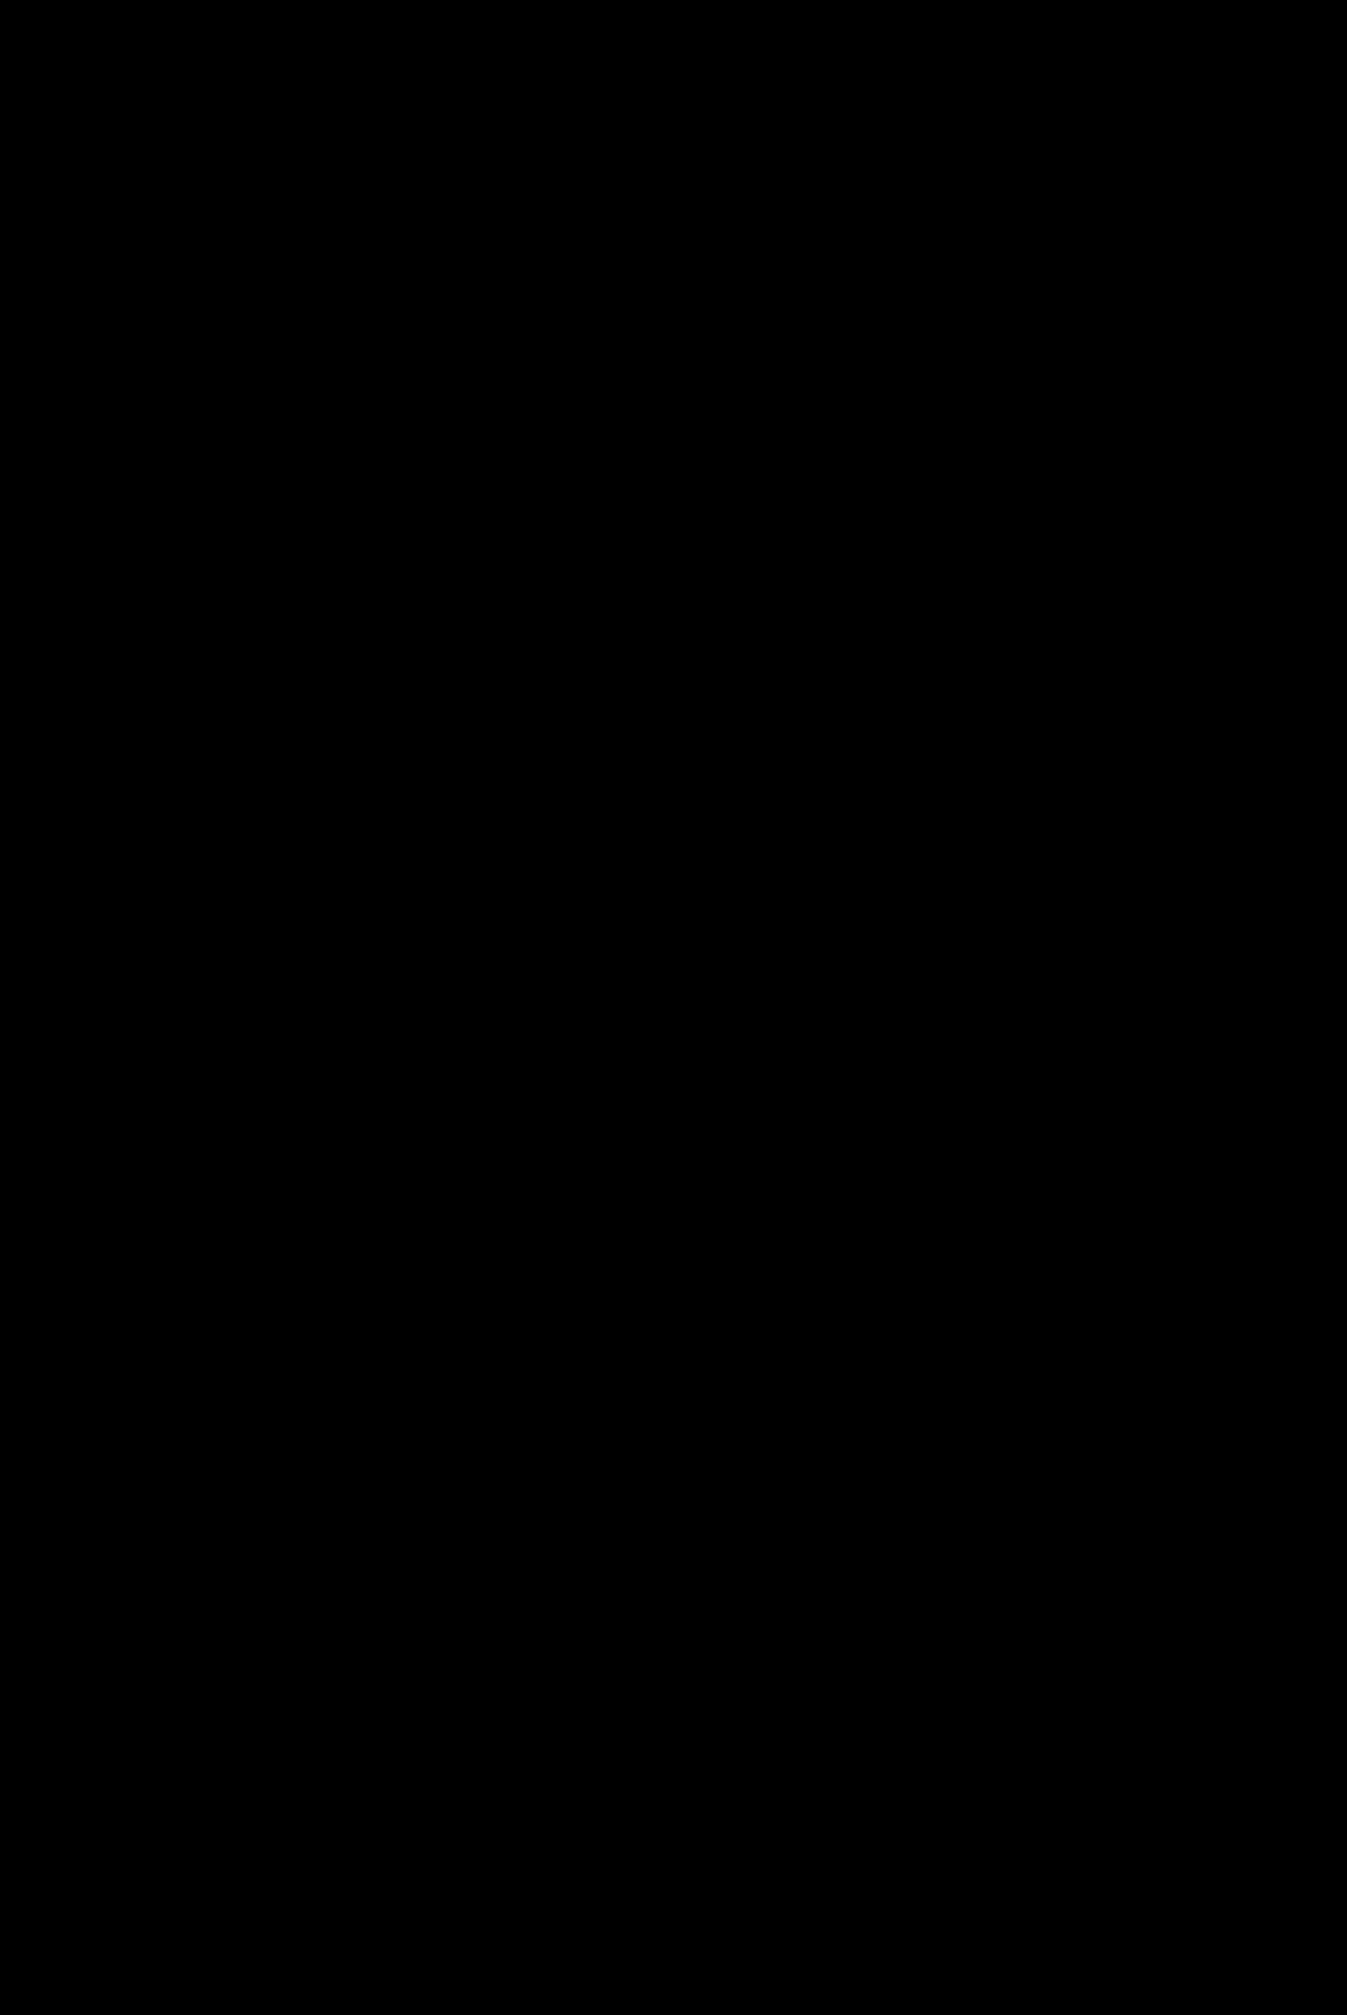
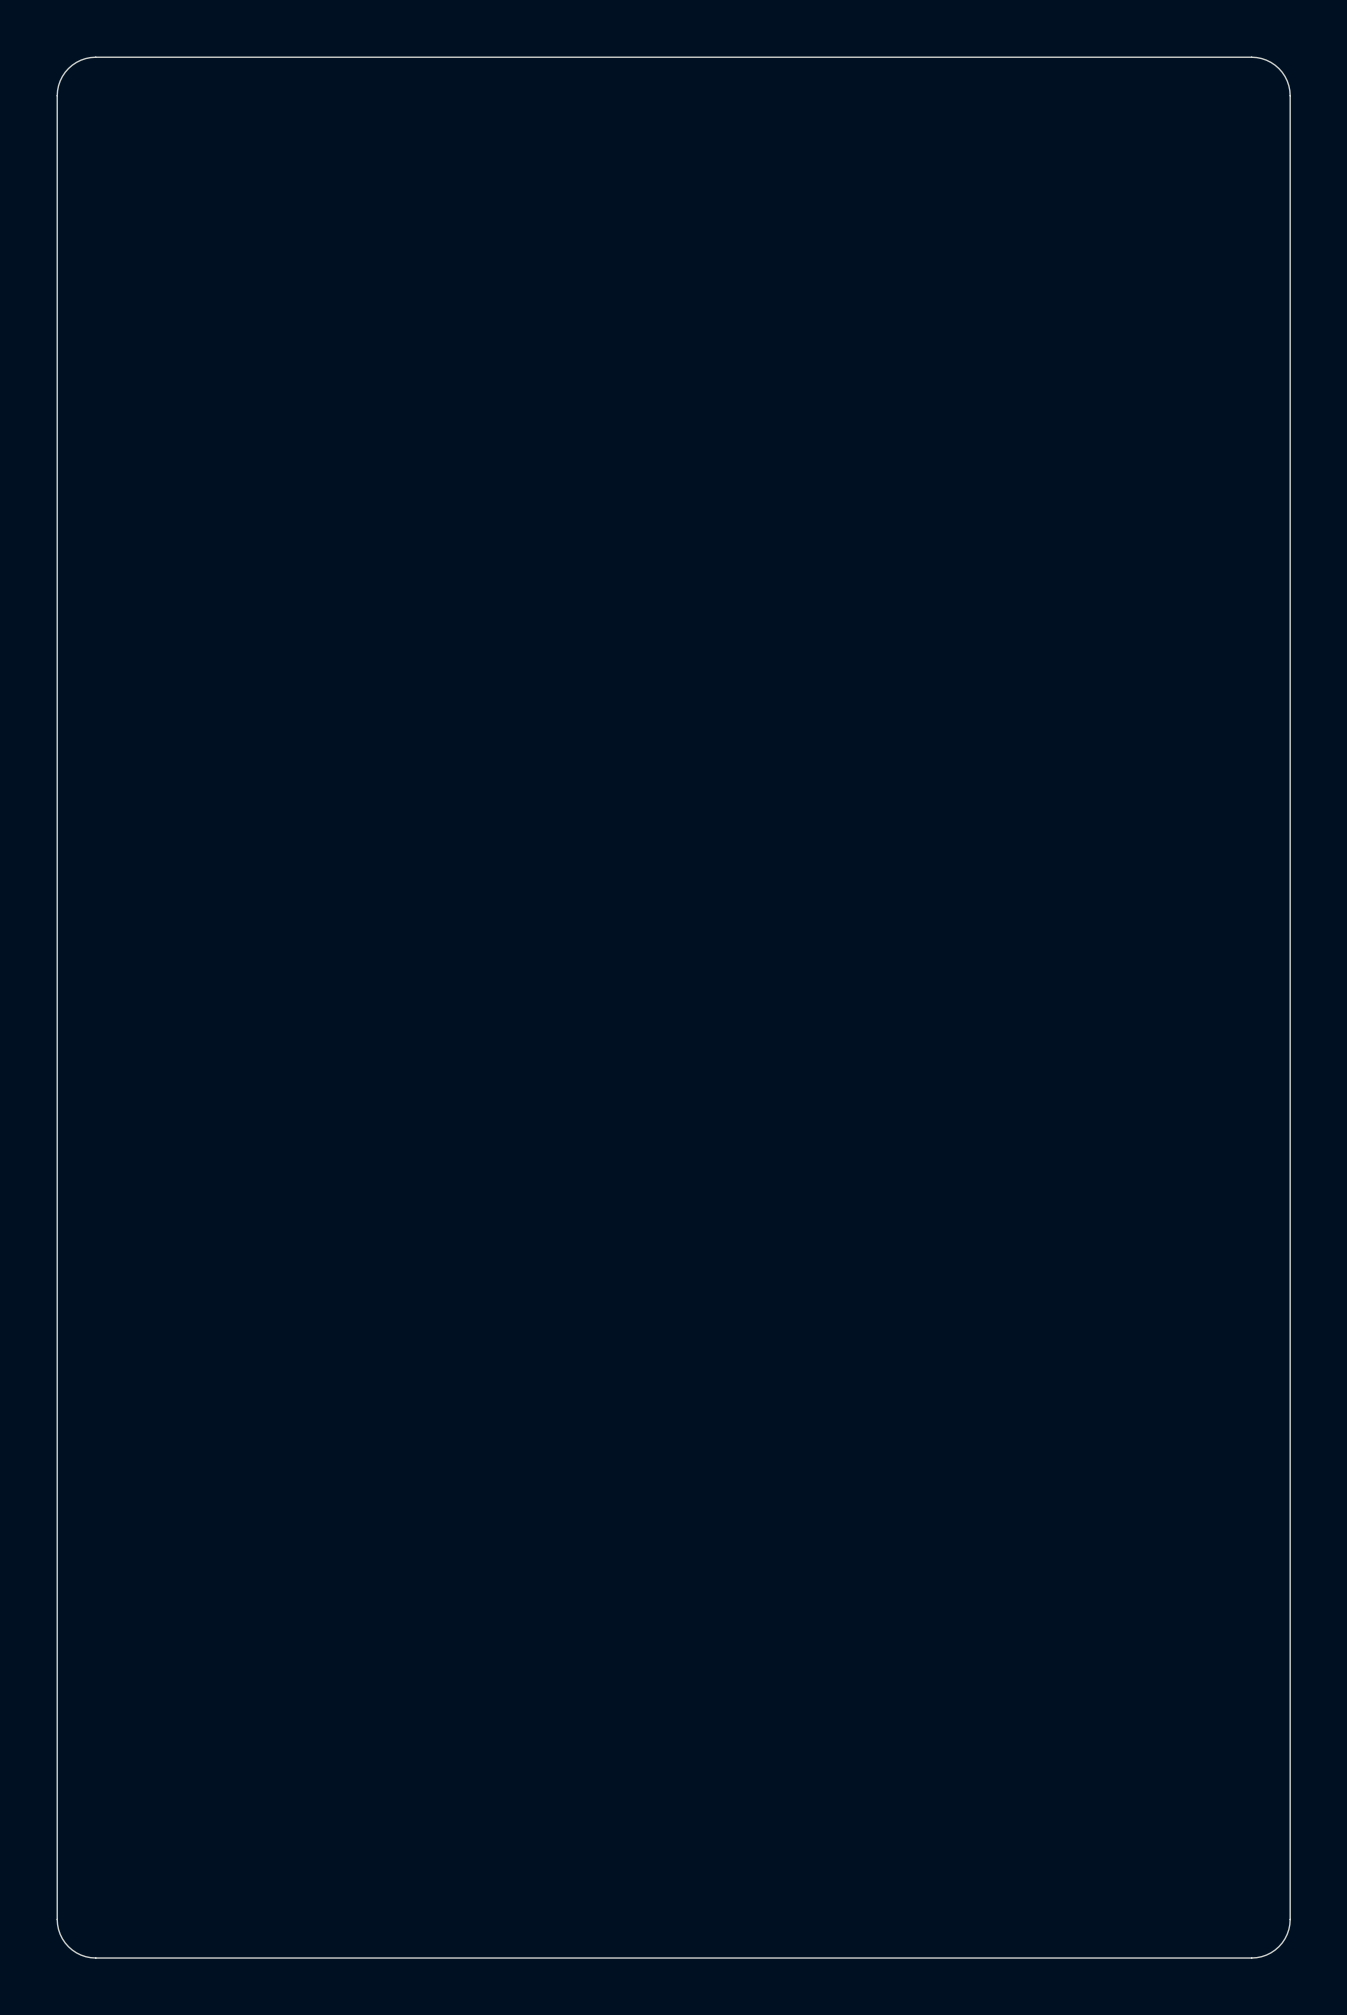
board edge: none -> (95, 57) (1251, 57) (1270, 62) (1285, 76) (1290, 95) (1290, 1919) (1285, 1938) (1270, 1952) (1251, 1958) (95, 1958) (76, 1952) (62, 1938) (57, 1919) (57, 95) (60, 81) (68, 68) (81, 60) (95, 57)

